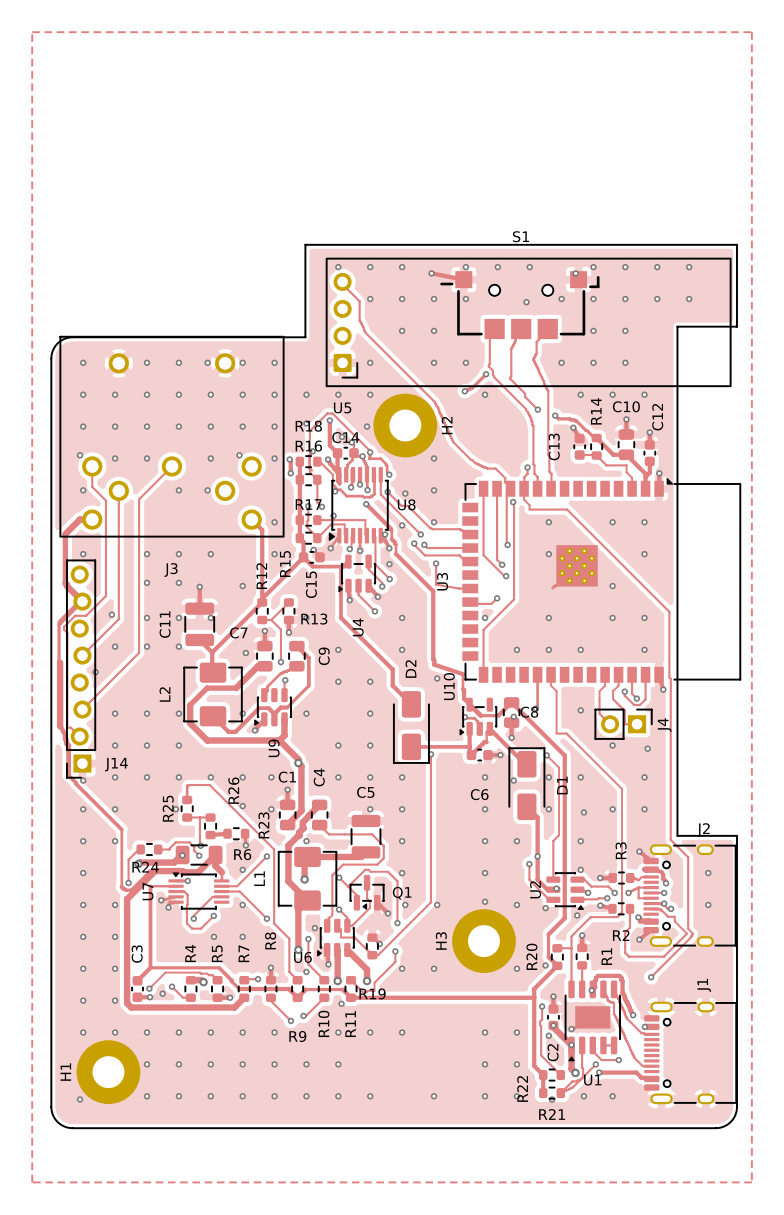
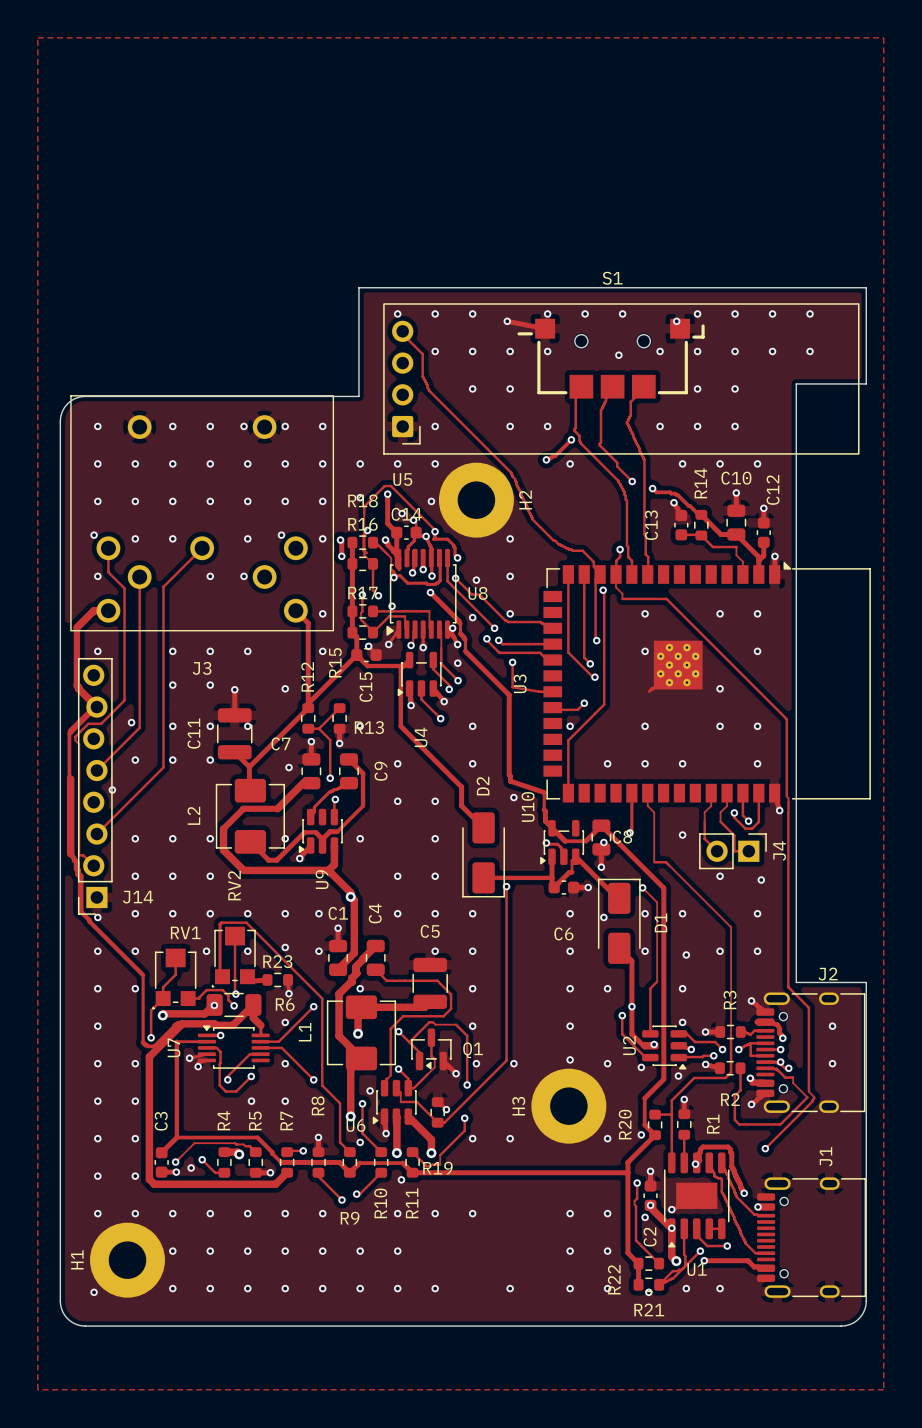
track: none -> (235, 936) (235, 960)
track: none -> (220, 940) (220, 971) (222, 976)
R25: (187, 808) -> none
via: none -> (247, 951)
track: none -> (175, 957) (175, 974) (163, 987) (163, 998)
RV2: none -> (233, 957)
track: (187, 817) (210, 817) -> none
R23 name rotation: 0° (263, 825) -> 90° clockwise (277, 961)
R26: (210, 826) -> none
RV1: none -> (174, 978)
R24: (149, 849) -> none

